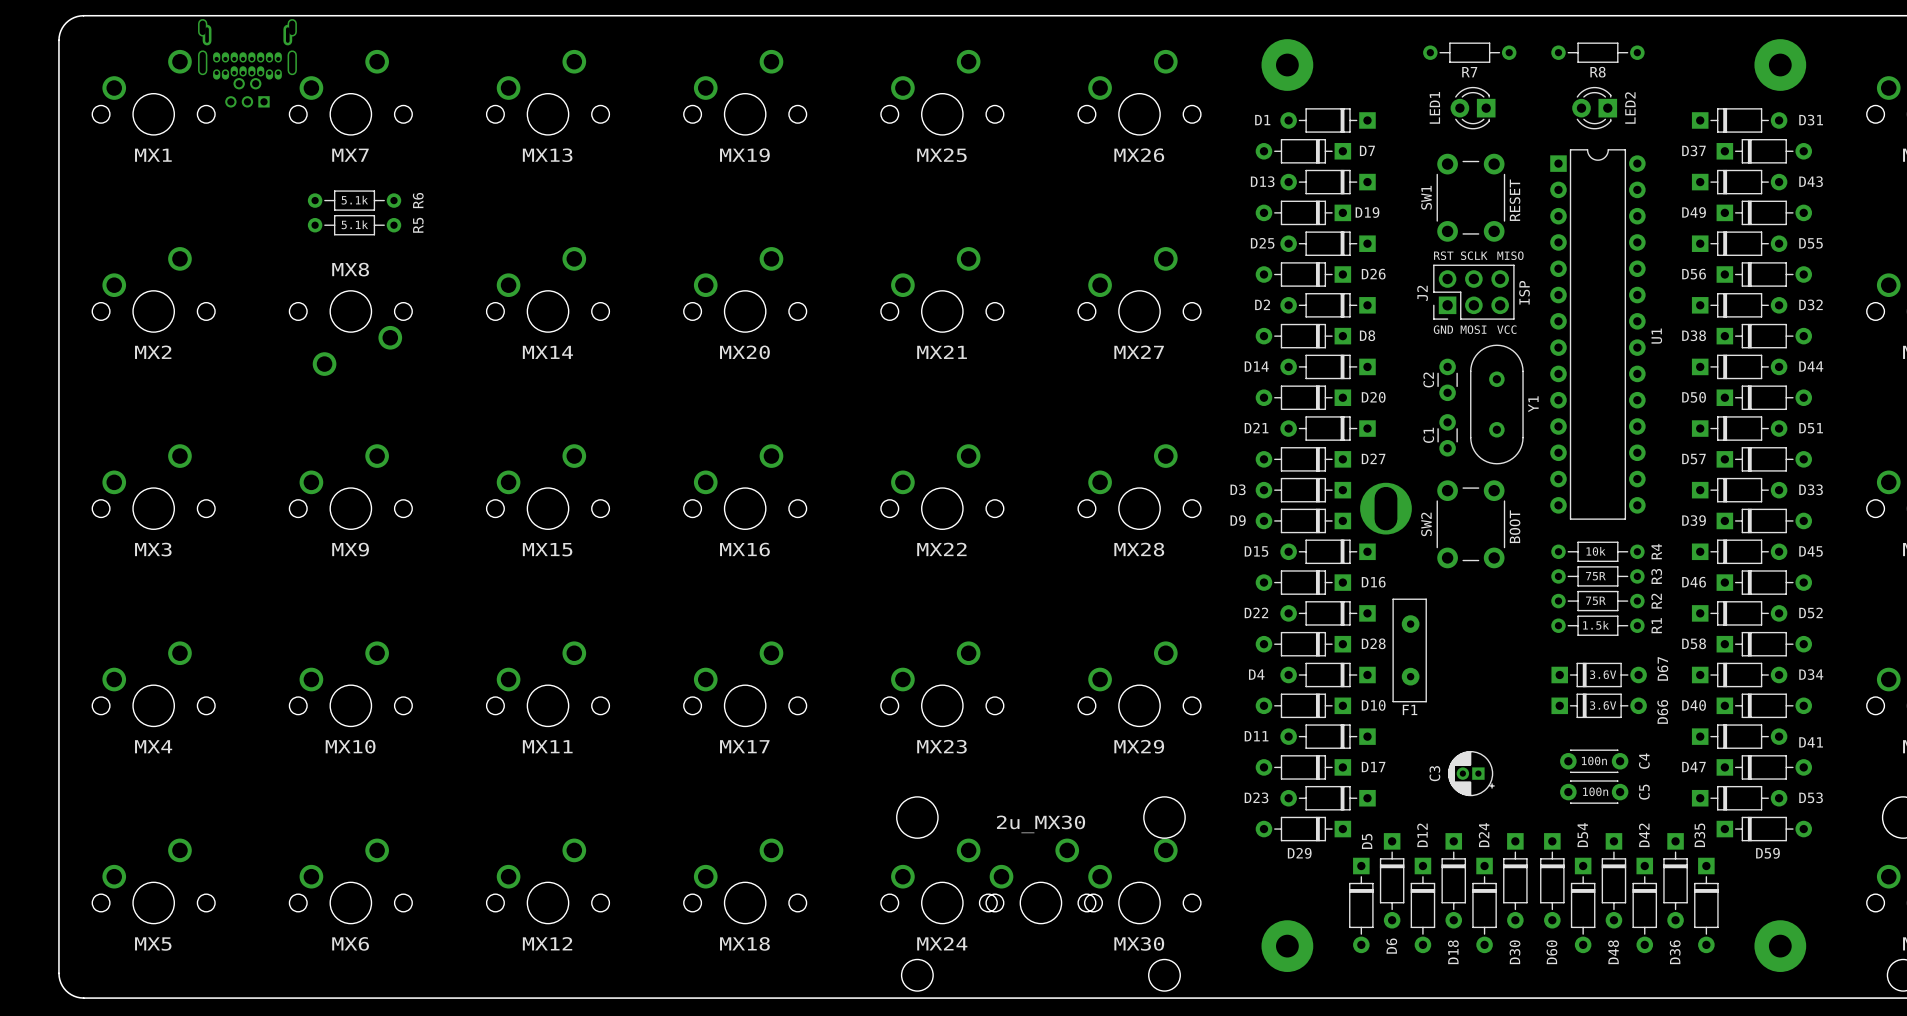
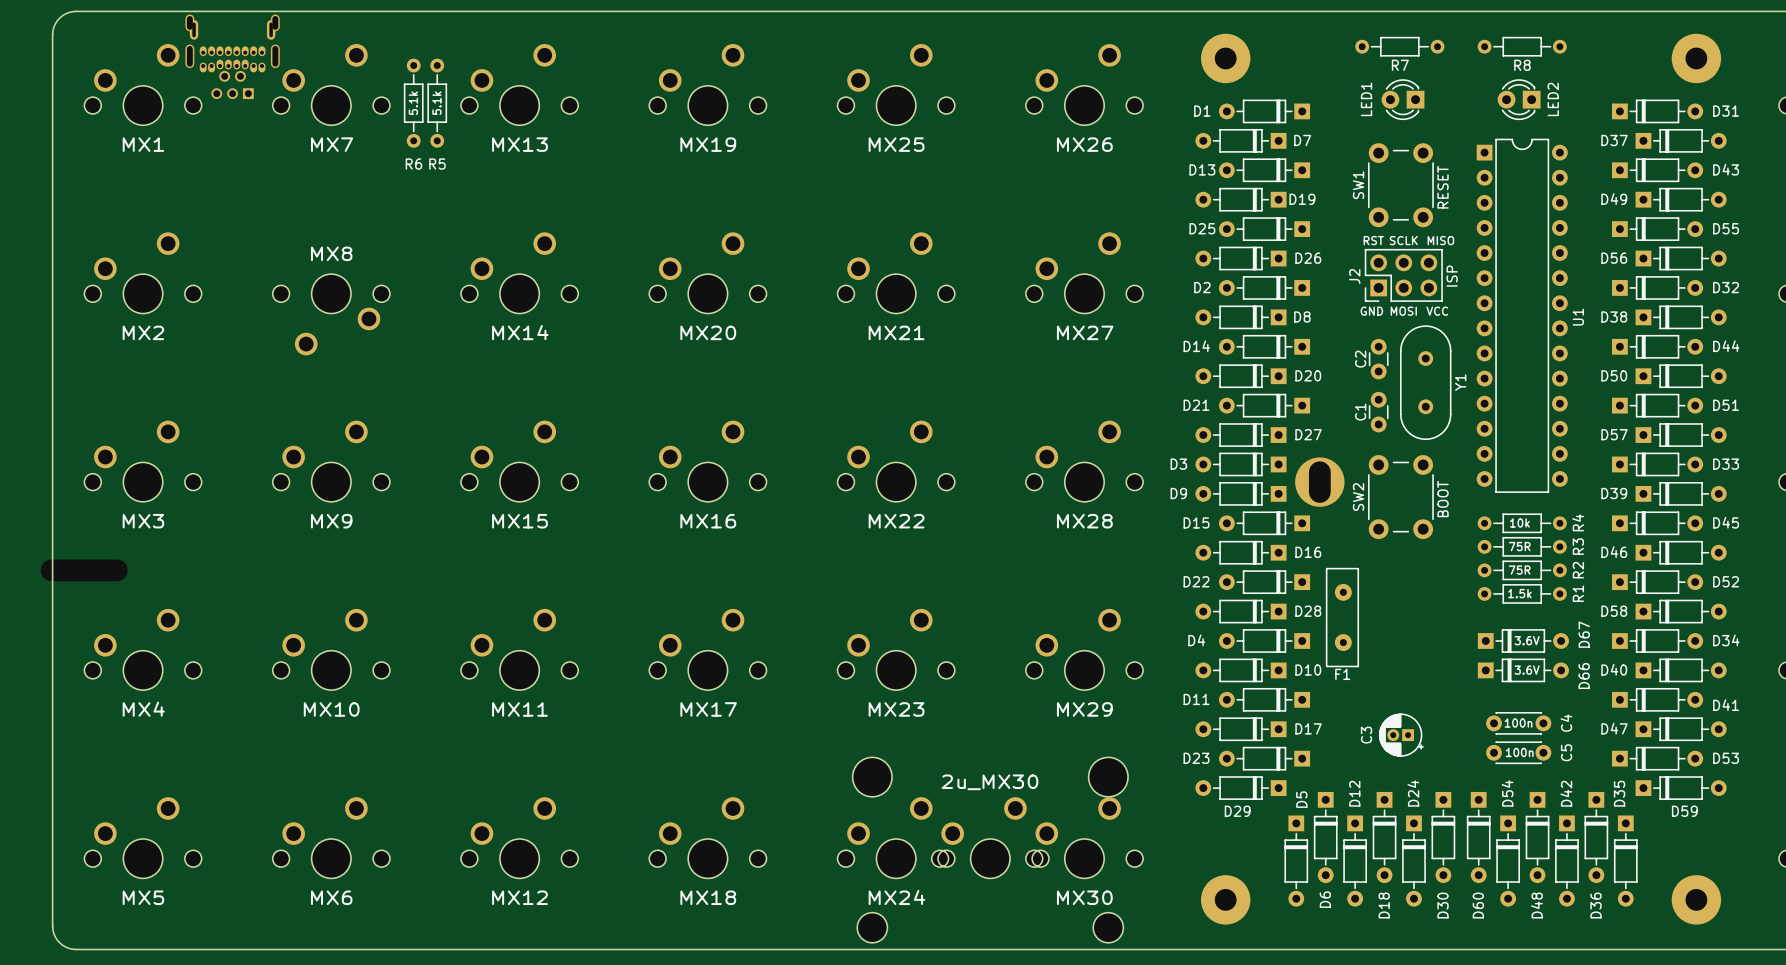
R6 rotation: 0° (354, 200) -> 90° clockwise (413, 103)
R6 position: (354, 200) -> (413, 103)
R5 rotation: 0° (354, 225) -> 90° clockwise (437, 103)
R5 position: (354, 225) -> (437, 103)

